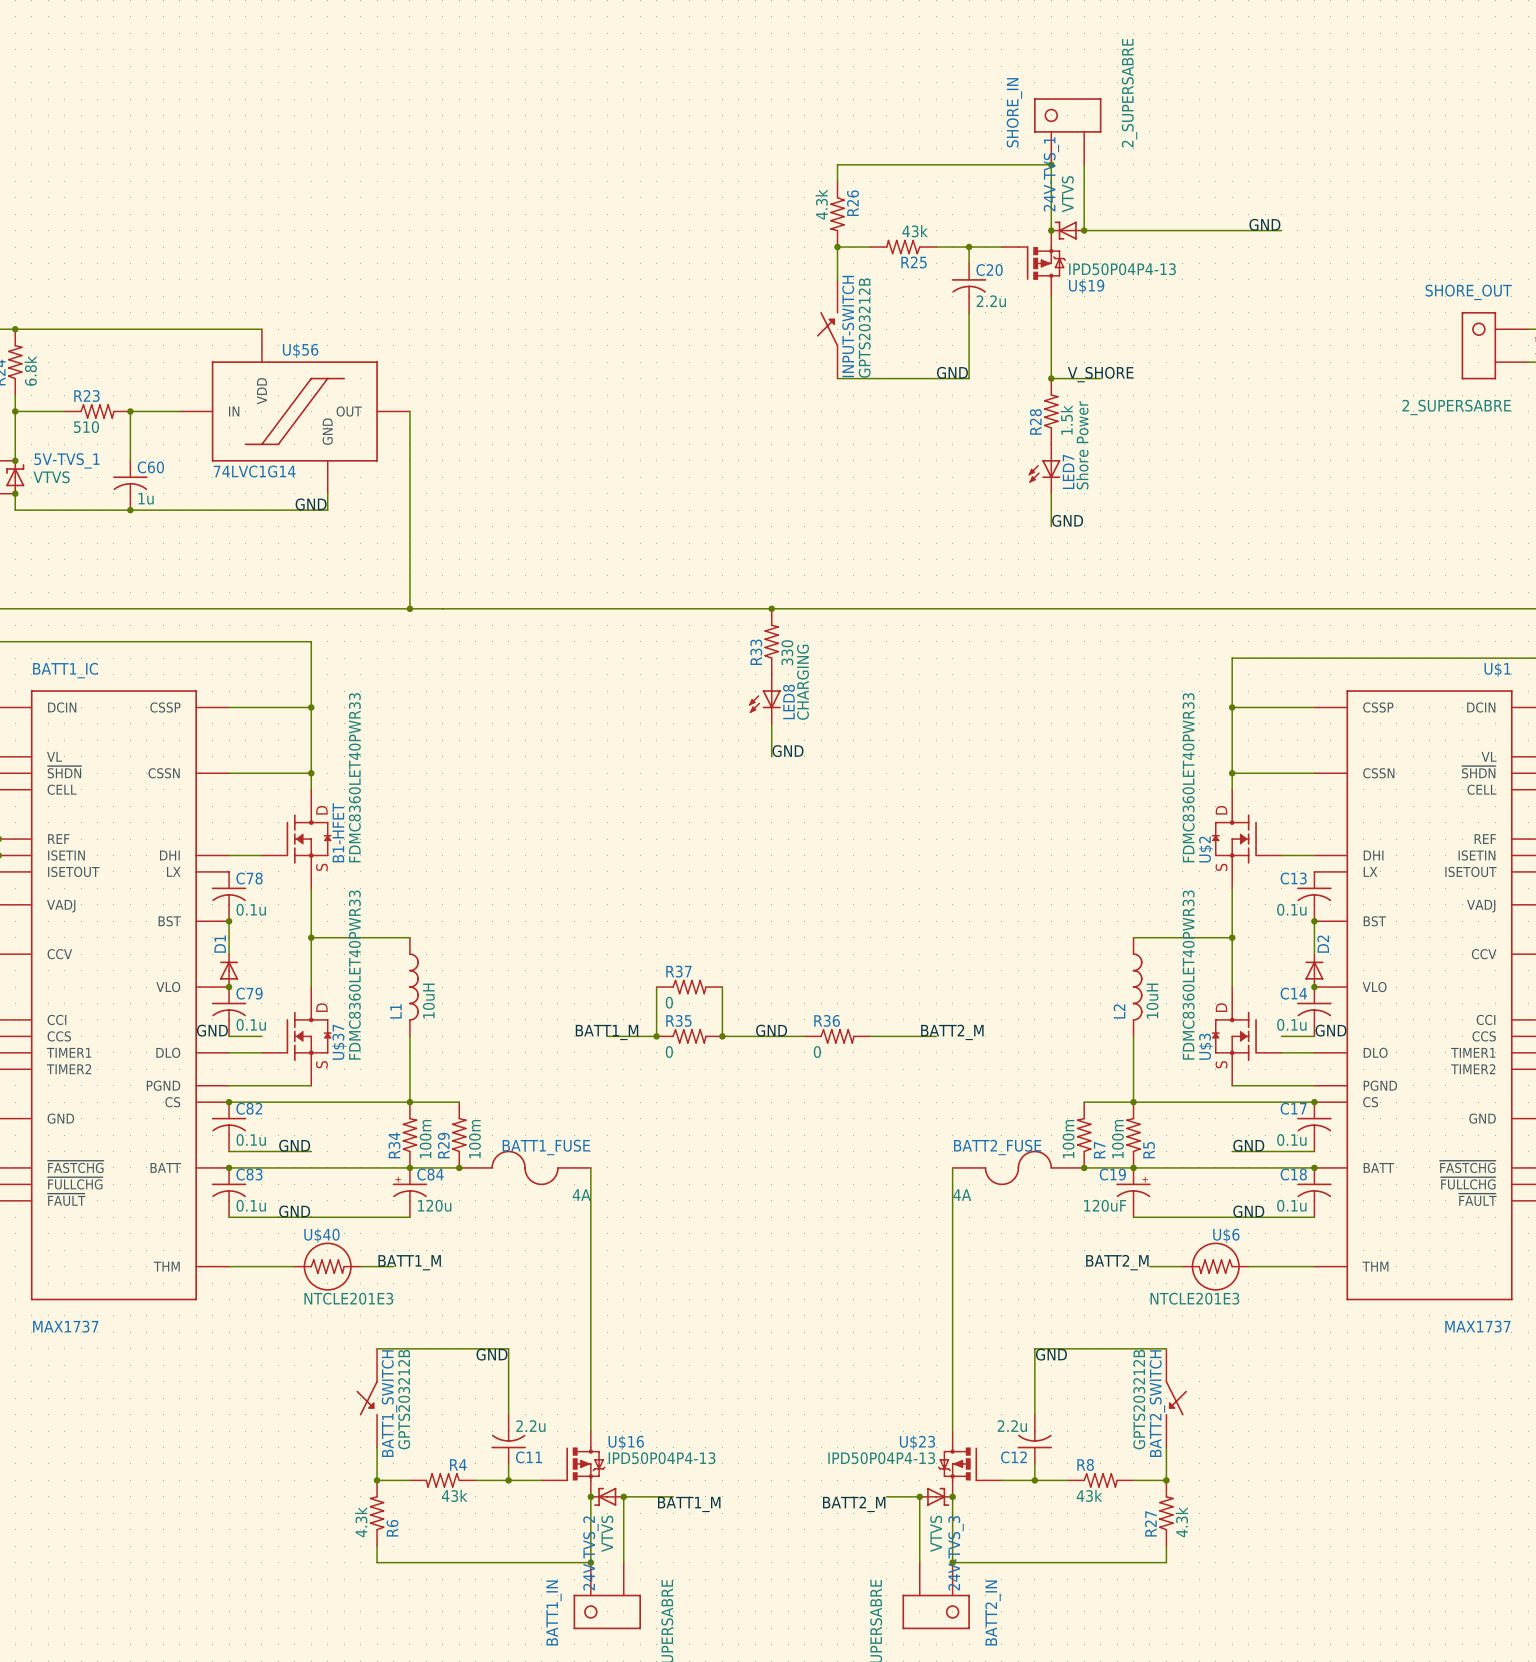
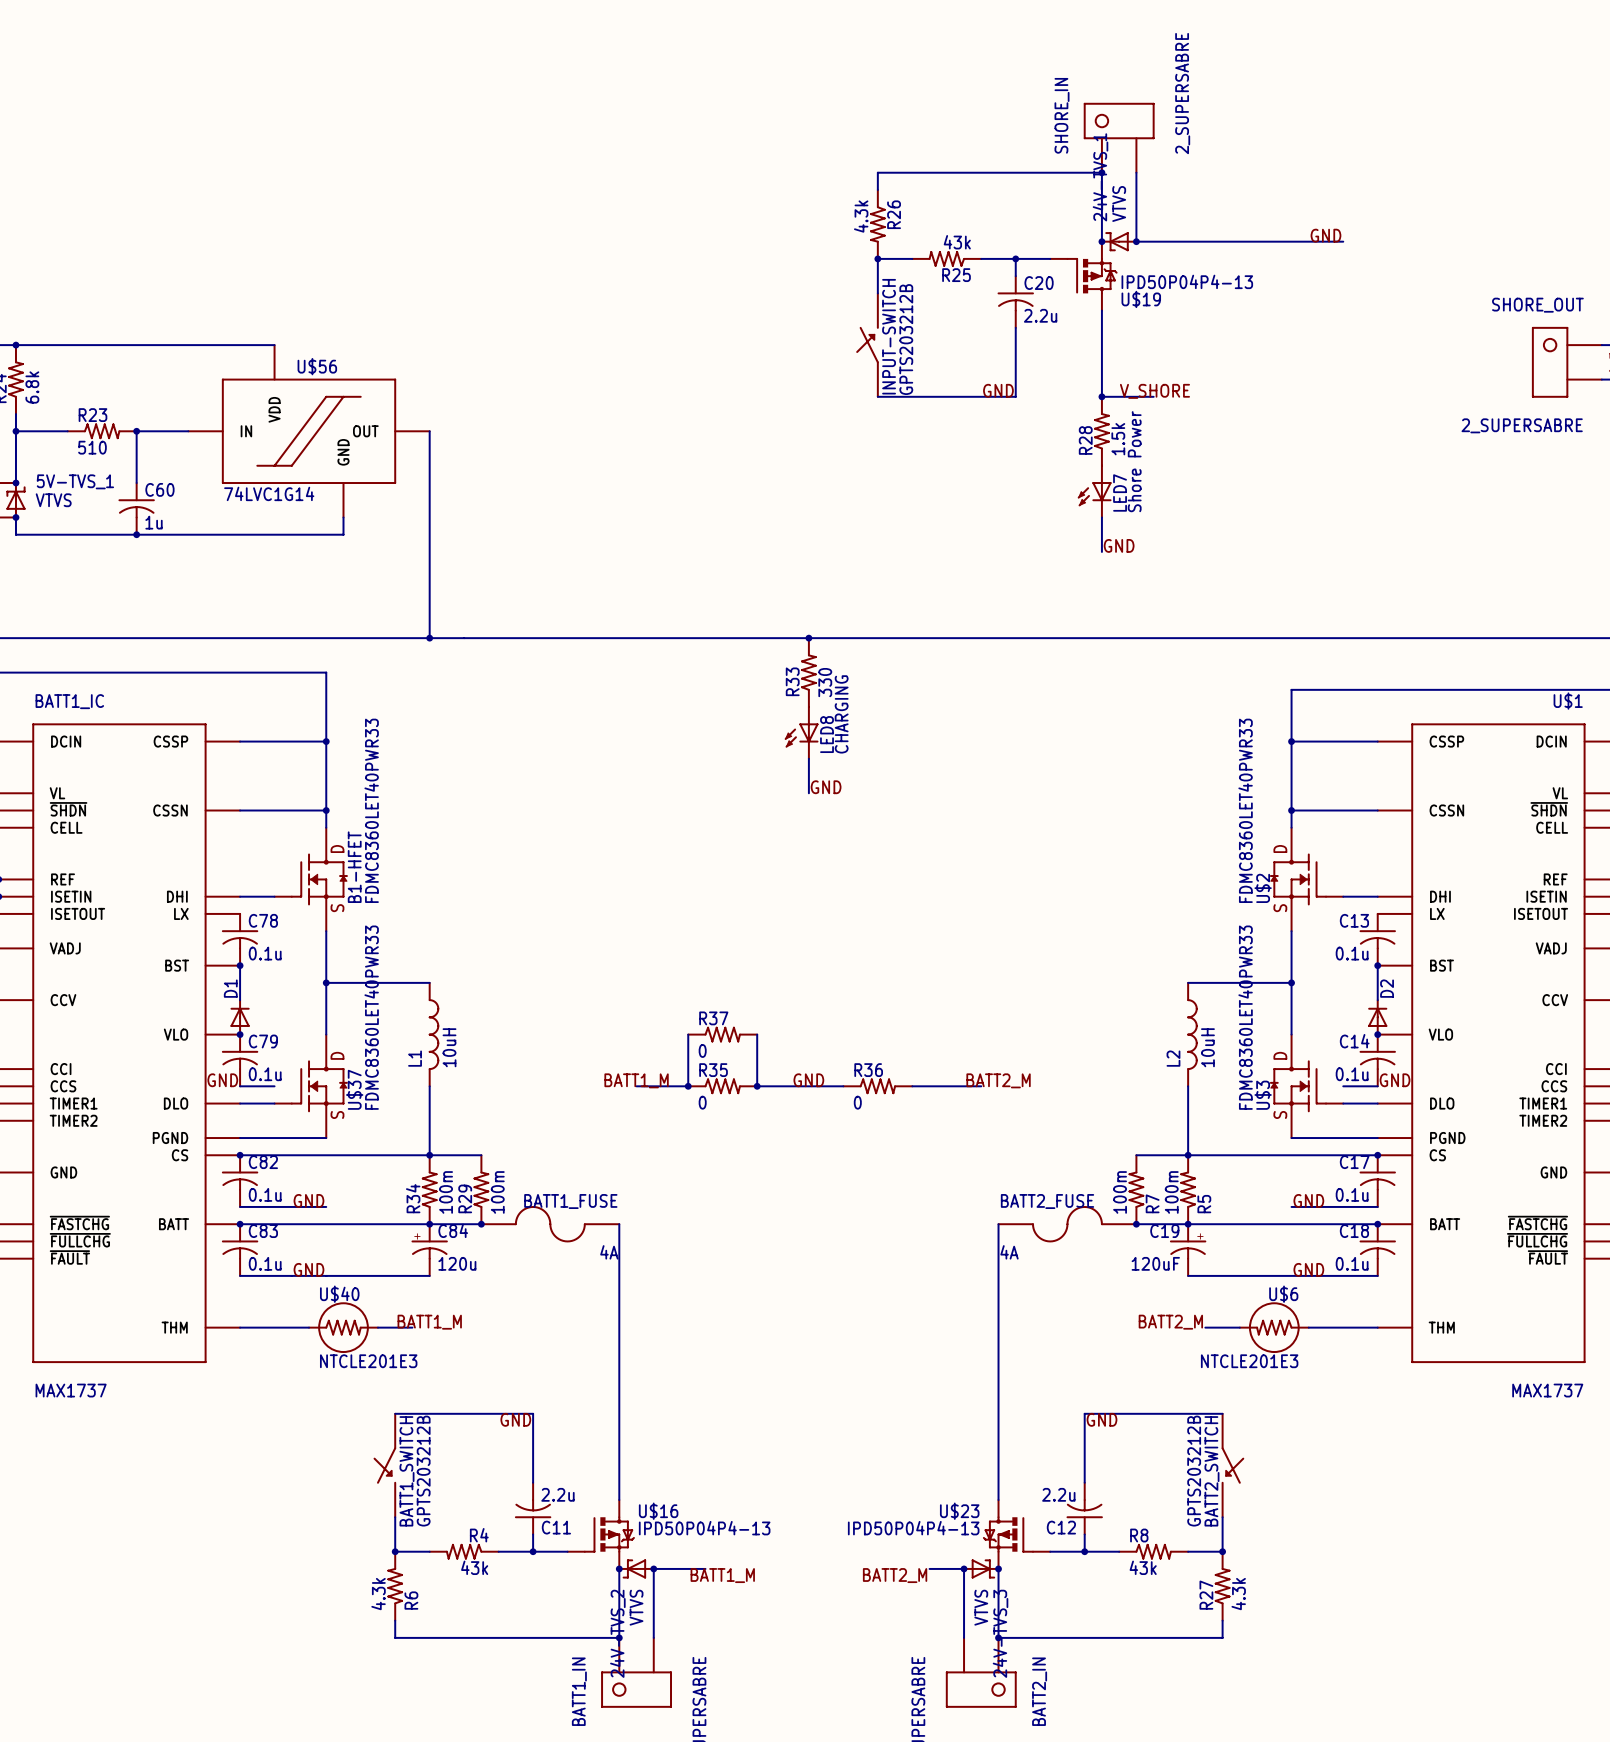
label: GND (311, 504) -> none

